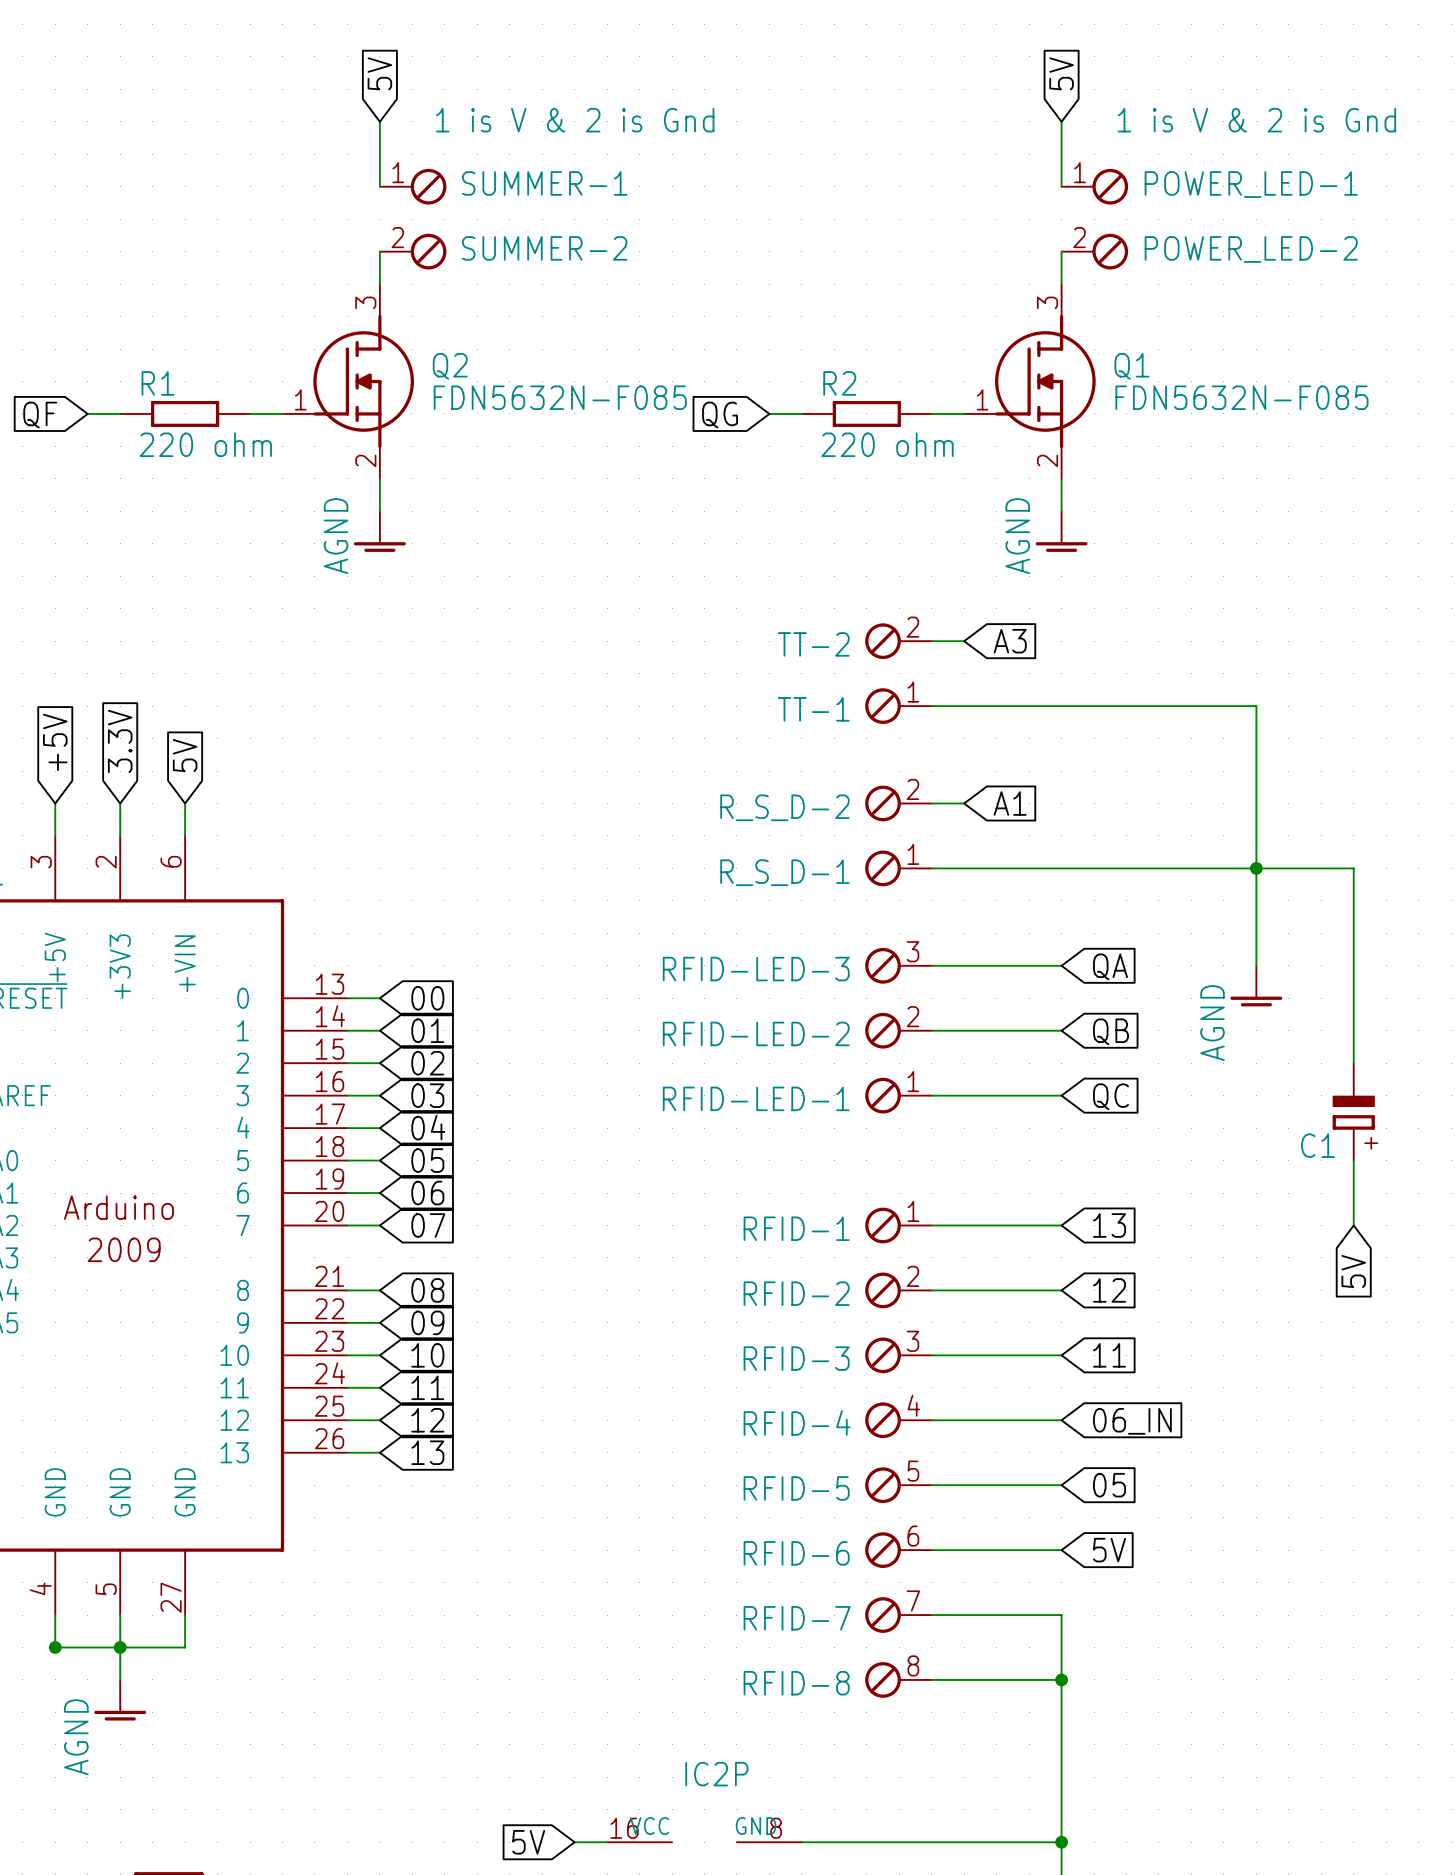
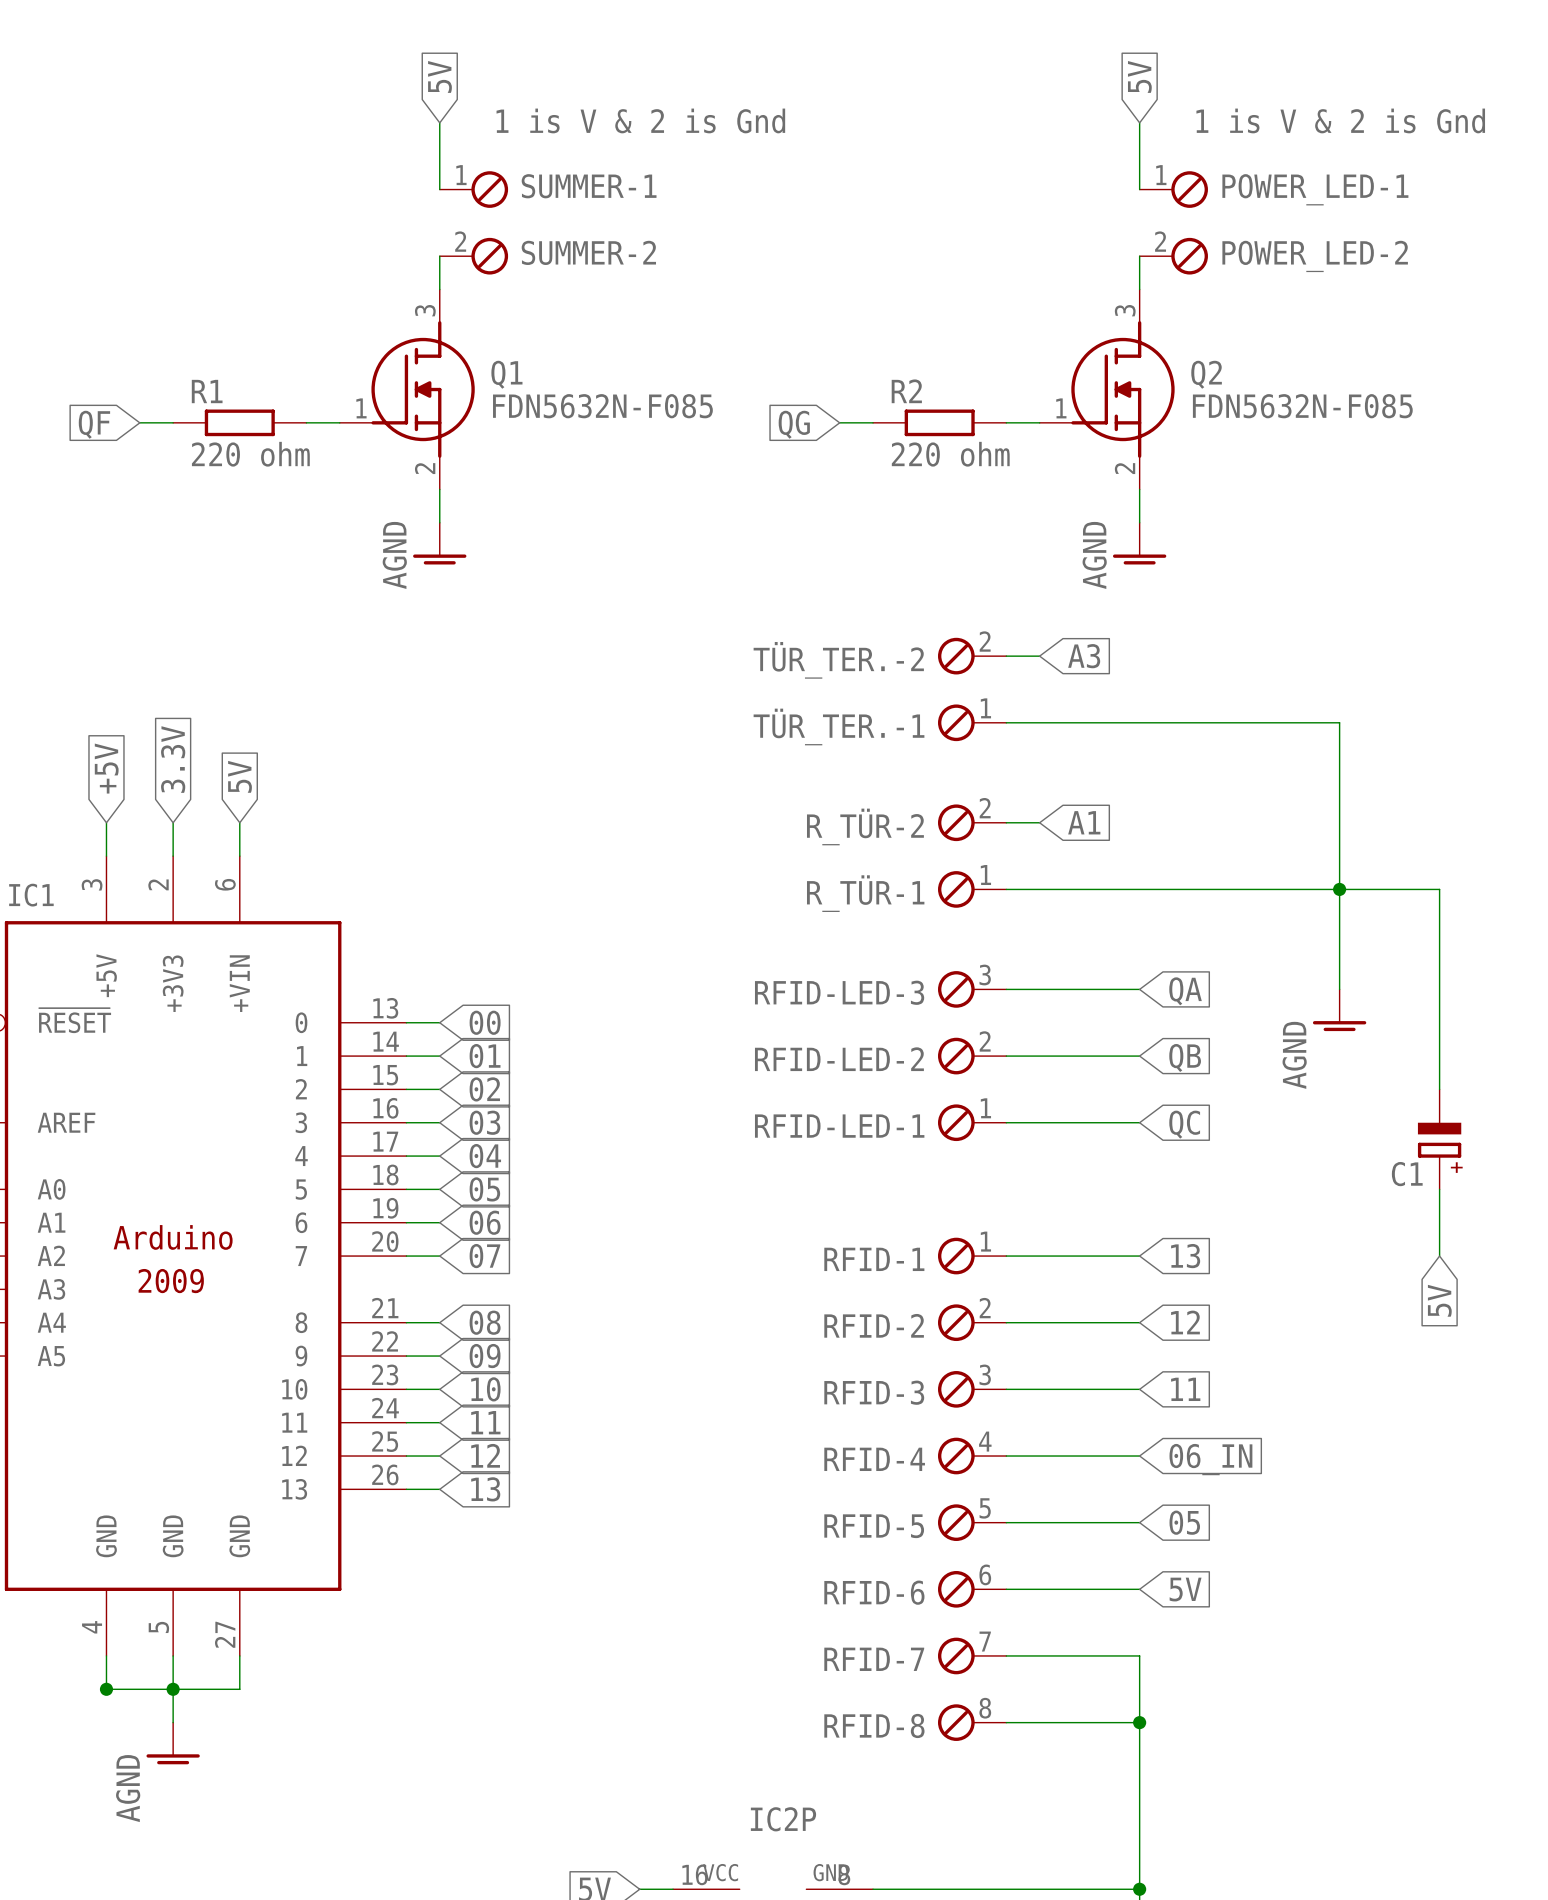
Q2 name: Q2 (450, 366) -> Q1 (506, 374)
Q1 name: Q1 (1131, 366) -> Q2 (1206, 374)
TT-2 name: TT-2 (813, 644) -> TÜR_TER.-2 (838, 660)
TT-1 name: TT-1 (813, 709) -> TÜR_TER.-1 (839, 726)
R_S_D-2 name: R_S_D-2 (784, 807) -> R_TÜR-2 (865, 826)
R_S_D-1 name: R_S_D-1 (784, 872) -> R_TÜR-1 (865, 893)

